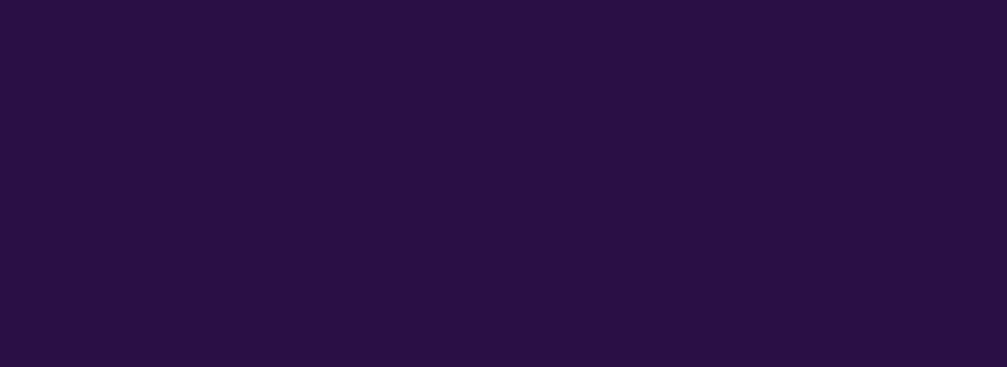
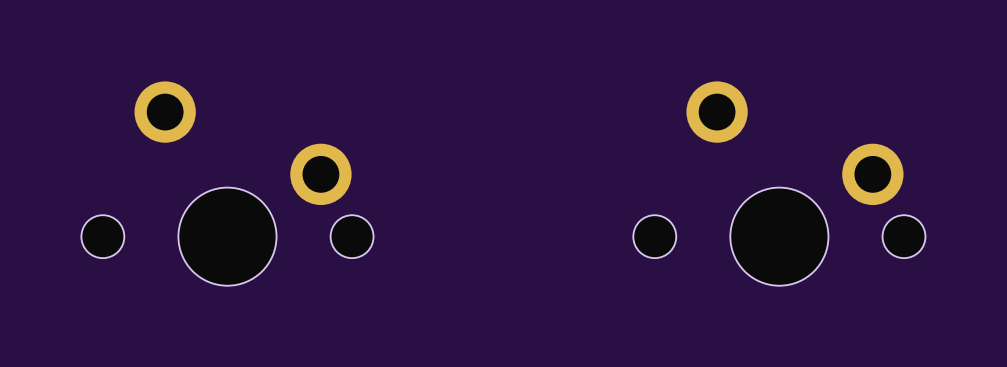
part: none -> (227, 183)
part: none -> (779, 183)

